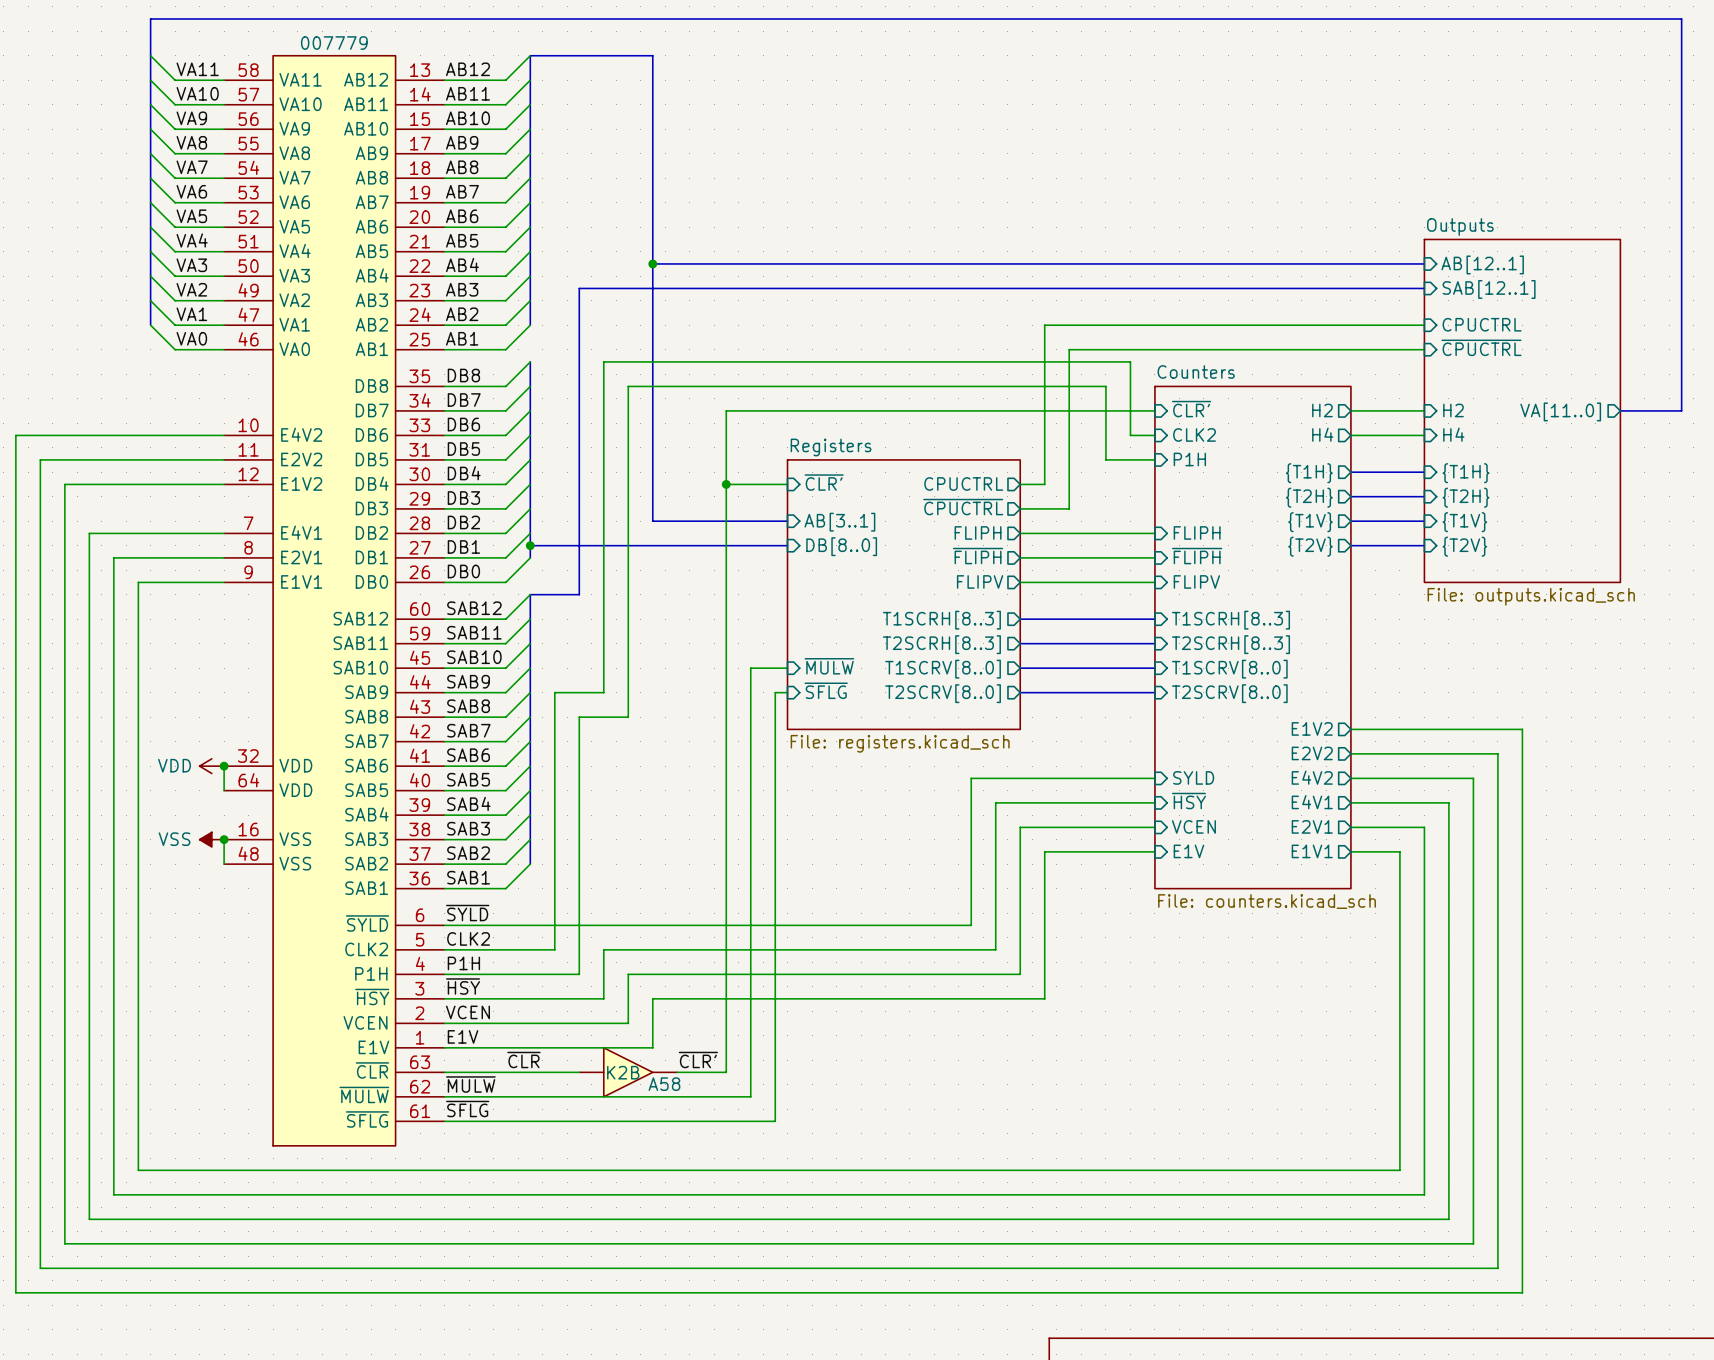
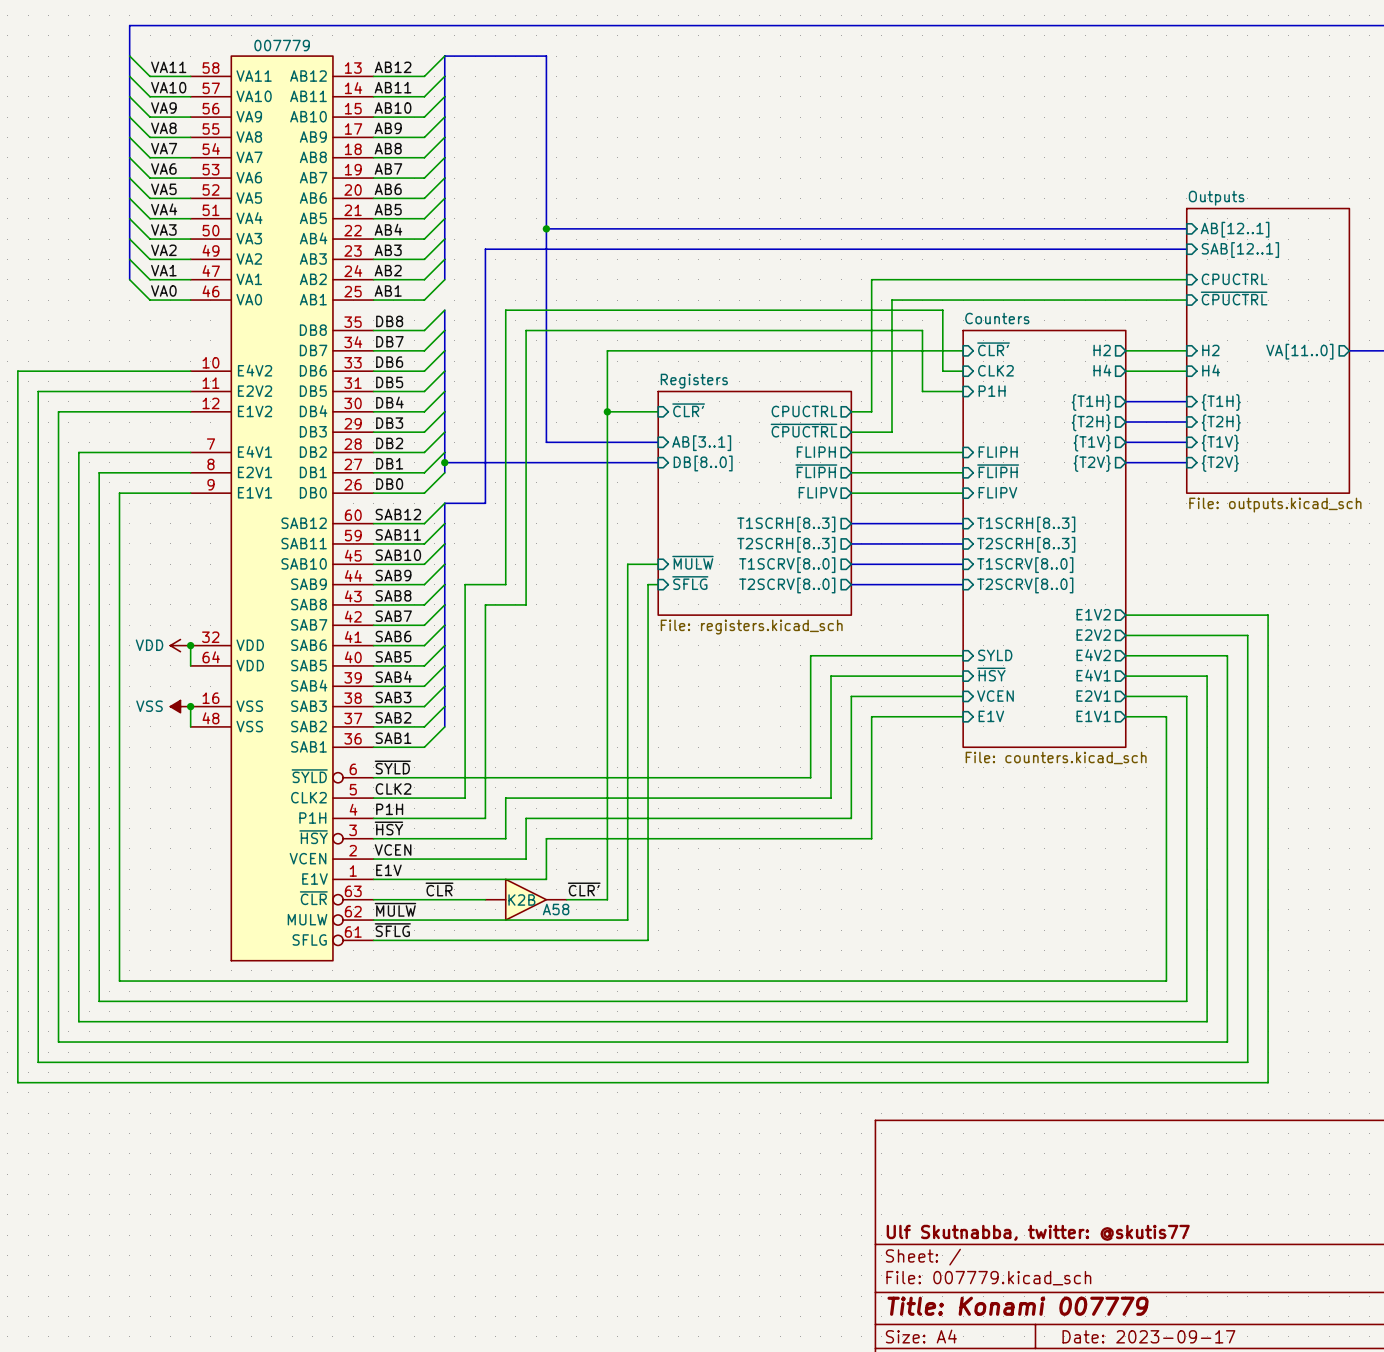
part symbol: [224, 55, 445, 1146] -> [190, 56, 374, 961]

